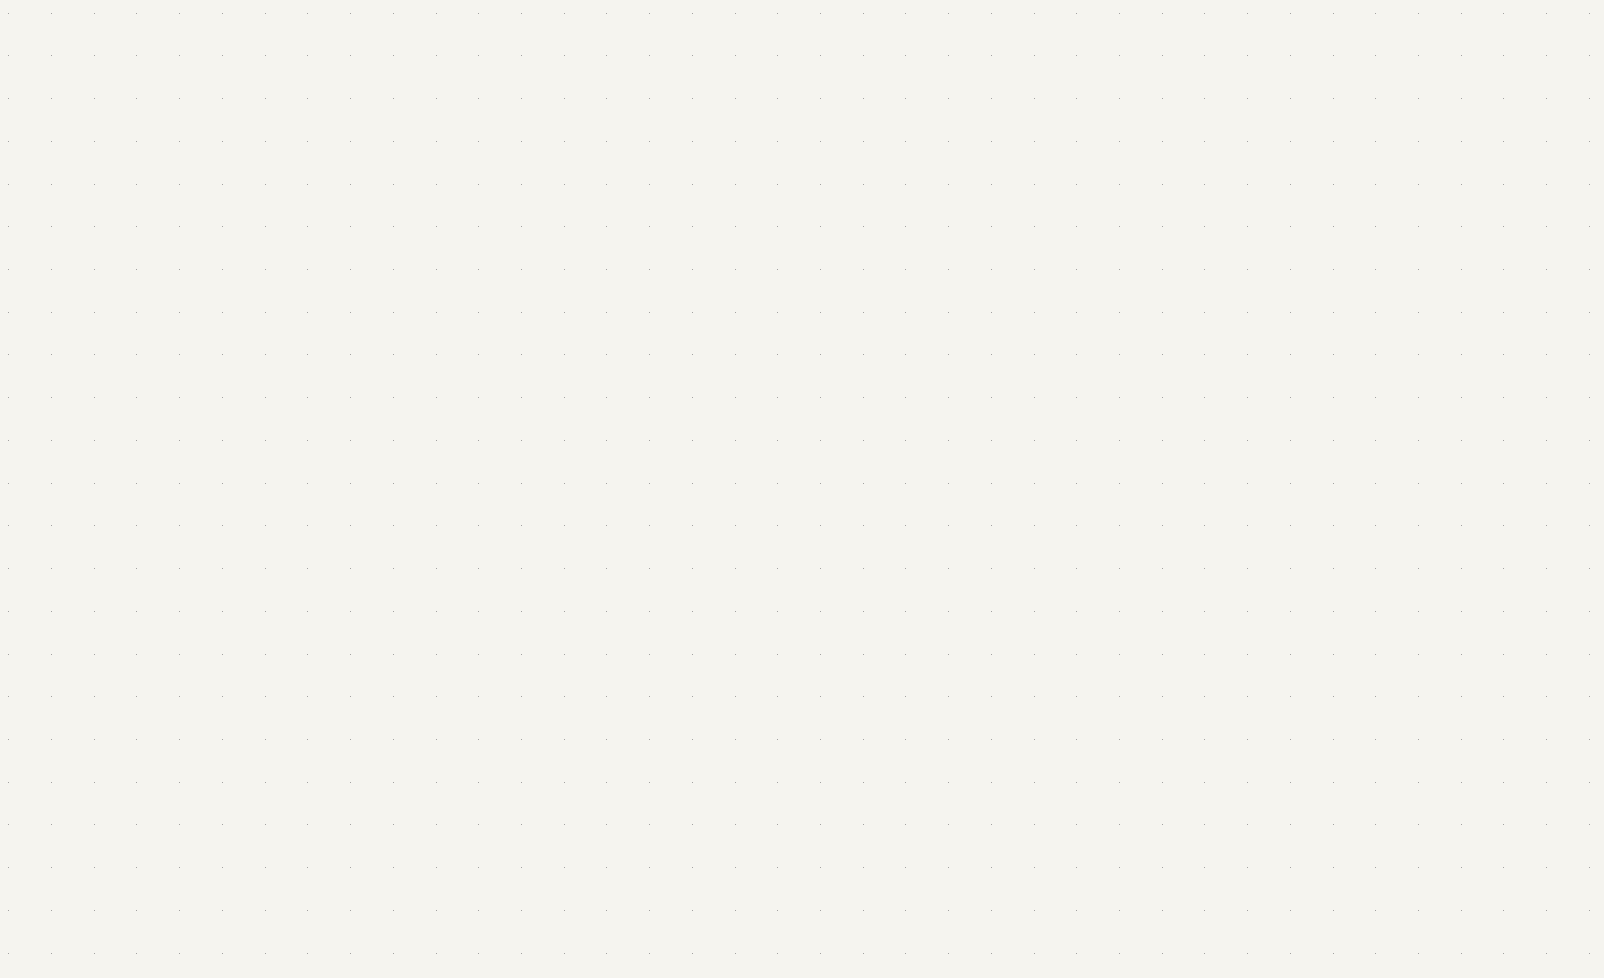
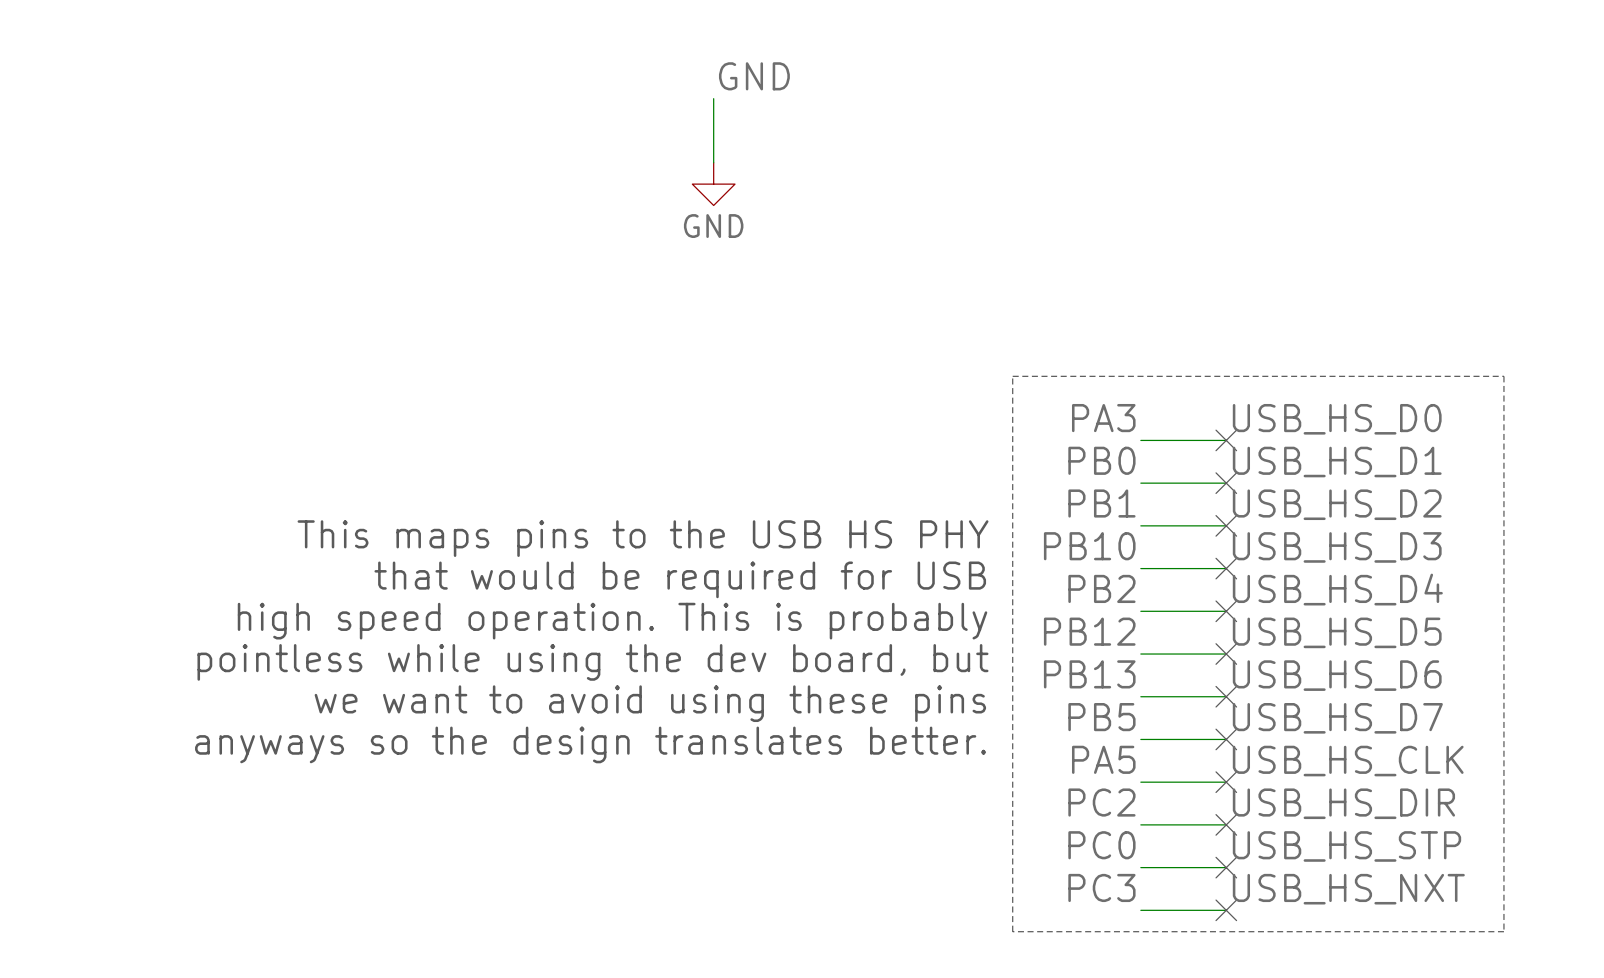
label: none -> GND (754, 76)
wire: none -> (713, 98) (713, 162)
power symbol: none -> GND (713, 184)
line: none -> (1012, 376) (1503, 376) (1503, 931) (1012, 931) (1012, 376)
label: none -> PA3 (1103, 418)
label: none -> USB_HS_D0 (1337, 419)
wire: none -> (1140, 440) (1226, 440)
no-connect mark: none -> (1226, 440)
label: none -> PB0 (1101, 460)
label: none -> USB_HS_D1 (1337, 462)
wire: none -> (1140, 483) (1226, 483)
no-connect mark: none -> (1226, 483)
label: none -> PB1 (1101, 503)
label: none -> USB_HS_D2 (1337, 504)
wire: none -> (1140, 525) (1226, 525)
no-connect mark: none -> (1226, 525)
text: none -> This maps pins to the USB HS PHY (643, 538)
label: none -> PB10 (1089, 546)
label: none -> USB_HS_D3 (1337, 547)
wire: none -> (1140, 568) (1226, 568)
no-connect mark: none -> (1226, 568)
text: none -> that would be required for USB (680, 579)
label: none -> PB2 (1101, 588)
label: none -> USB_HS_D4 (1337, 589)
wire: none -> (1140, 611) (1226, 611)
no-connect mark: none -> (1226, 611)
text: none -> high speed operation. This is probably (612, 621)
label: none -> PB12 (1089, 631)
label: none -> USB_HS_D5 (1337, 632)
wire: none -> (1140, 654) (1226, 654)
no-connect mark: none -> (1226, 654)
text: none -> pointless while using the dev board, but (592, 662)
label: none -> PB13 (1089, 674)
label: none -> USB_HS_D6 (1337, 675)
wire: none -> (1140, 696) (1226, 696)
no-connect mark: none -> (1226, 696)
text: none -> we want to avoid using these pins (650, 703)
label: none -> PB5 (1101, 717)
label: none -> USB_HS_D7 (1337, 718)
wire: none -> (1140, 739) (1226, 739)
no-connect mark: none -> (1226, 739)
text: none -> anyways so the design translates better. (590, 744)
label: none -> PA5 (1103, 759)
label: none -> USB_HS_CLK (1348, 761)
wire: none -> (1140, 782) (1226, 782)
no-connect mark: none -> (1226, 782)
label: none -> PC2 (1101, 802)
label: none -> USB_HS_DIR (1343, 803)
wire: none -> (1140, 824) (1226, 824)
no-connect mark: none -> (1226, 824)
label: none -> PC0 (1101, 845)
label: none -> USB_HS_STP (1346, 846)
wire: none -> (1140, 867) (1226, 867)
no-connect mark: none -> (1226, 867)
label: none -> PC3 (1101, 887)
label: none -> USB_HS_NXT (1348, 889)
wire: none -> (1140, 910) (1226, 910)
no-connect mark: none -> (1226, 910)

